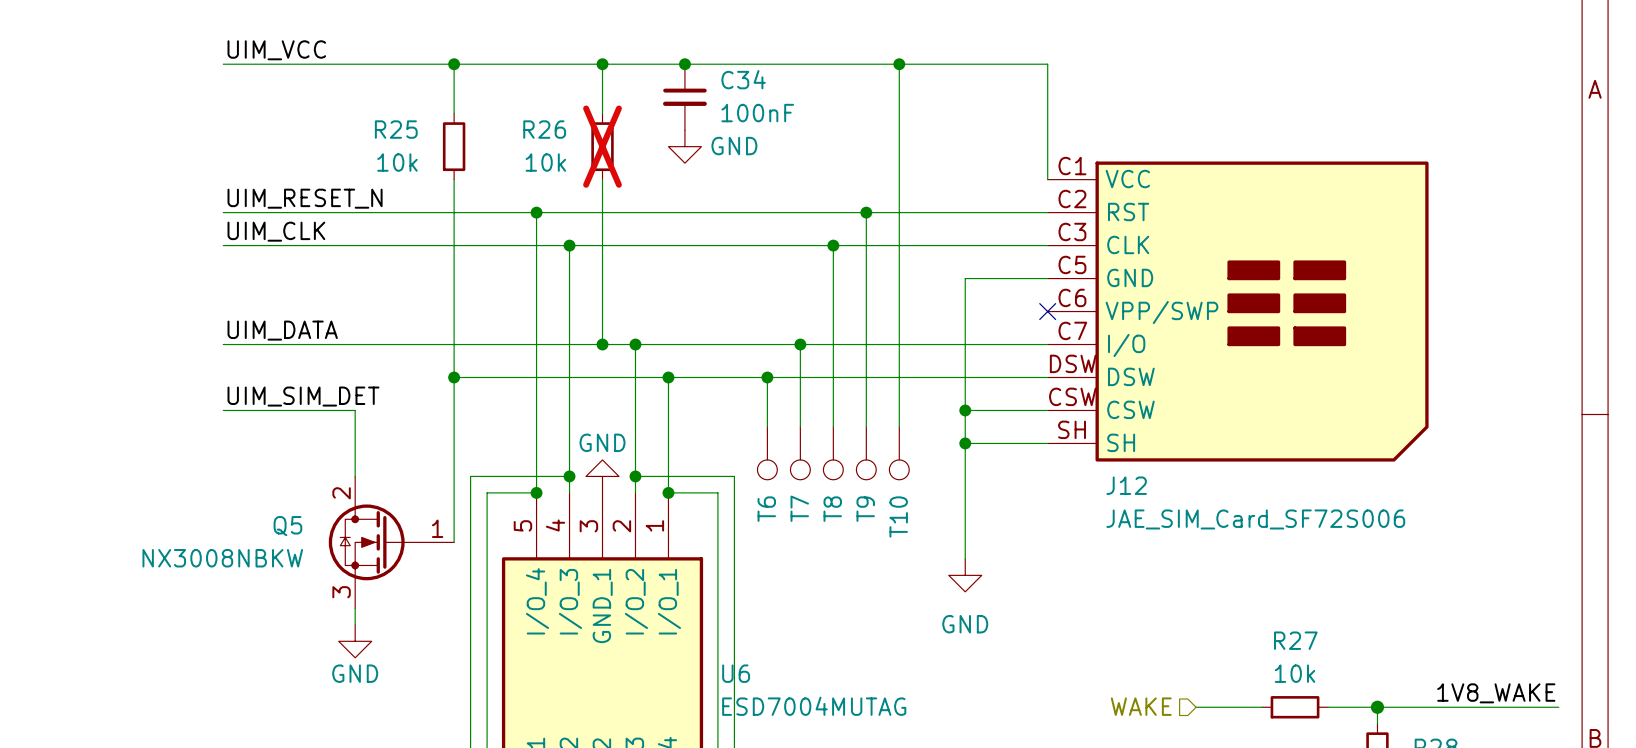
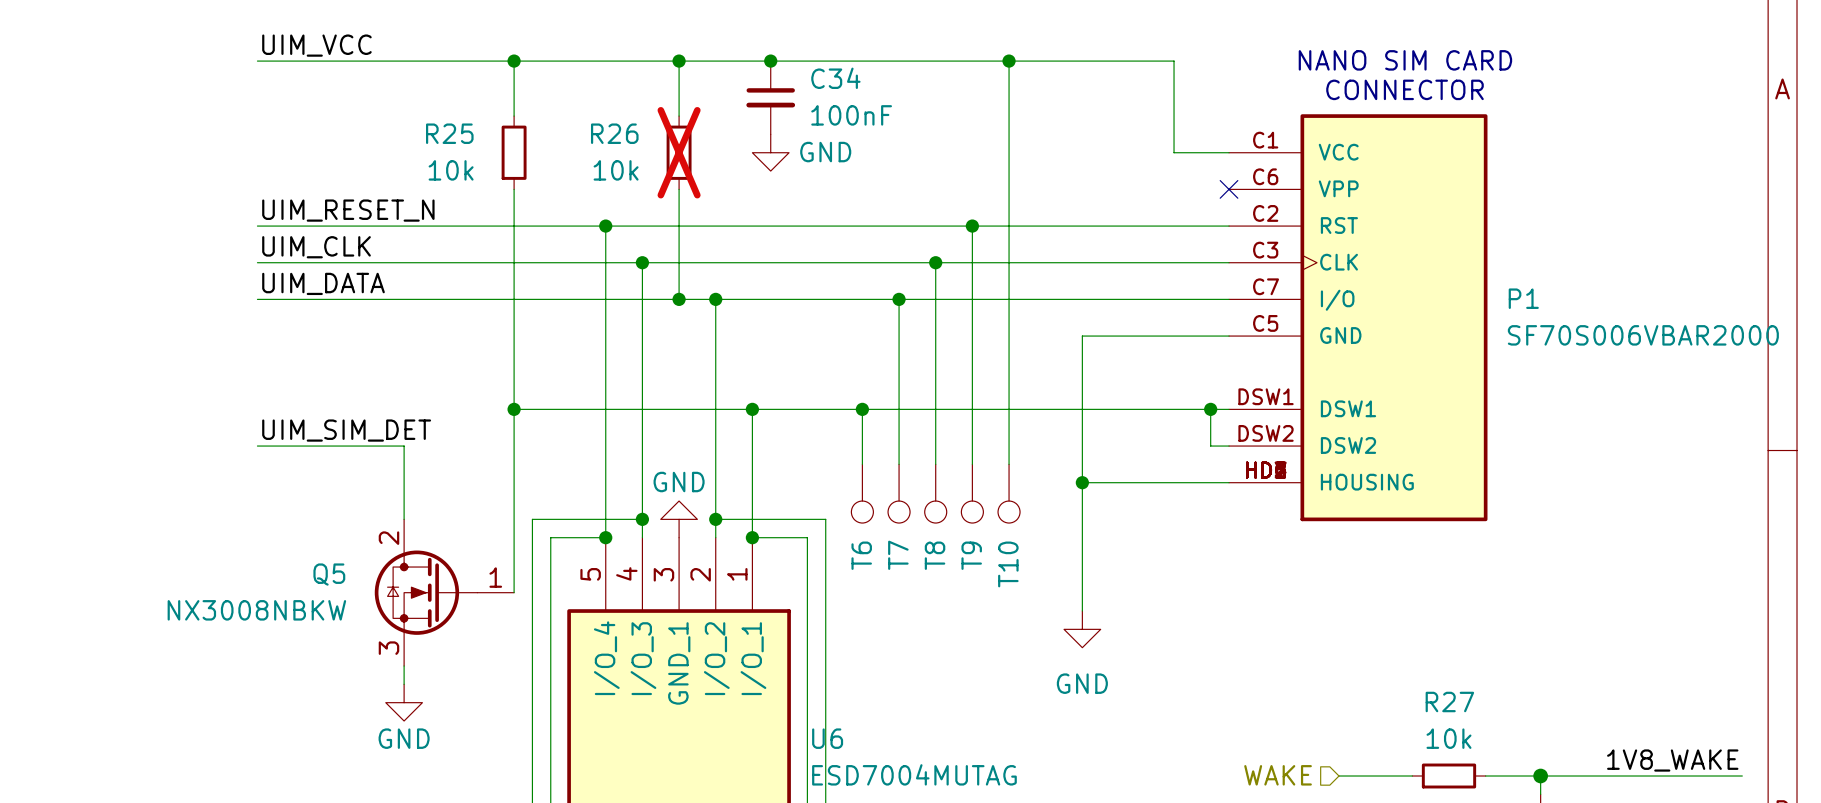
text: none -> NANO SIM CARD (1405, 60)
text: none -> CONNECTOR (1404, 89)
wire: (1047, 146) (1047, 179) -> (1174, 152) (1229, 152)
no-connect mark: none -> (1229, 189)
wire: none -> (257, 299) (1082, 299)
wire: (602, 278) (602, 344) -> (715, 299) (715, 372)
junction: none -> (679, 299)
junction: none -> (715, 299)
wire: none -> (899, 299) (899, 372)
wire: (965, 278) (965, 311) -> (1229, 336) (1082, 336)
P1: none -> SF70S006VBAR2000 (1358, 317)
no-connect mark: (1047, 311) -> none
J12: JAE_SIM_Card_SF72S006 (1238, 311) -> none
label position: UIM_DATA (282, 330) -> UIM_DATA (323, 283)
wire: (223, 344) (1047, 344) -> none
junction: (602, 344) -> none
junction: (635, 344) -> none
junction position: (800, 344) -> (899, 299)
wire: none -> (1210, 409) (1210, 446) (1229, 446)
junction: none -> (1210, 409)
wire: (965, 410) (1047, 410) -> none
junction: (965, 410) -> none

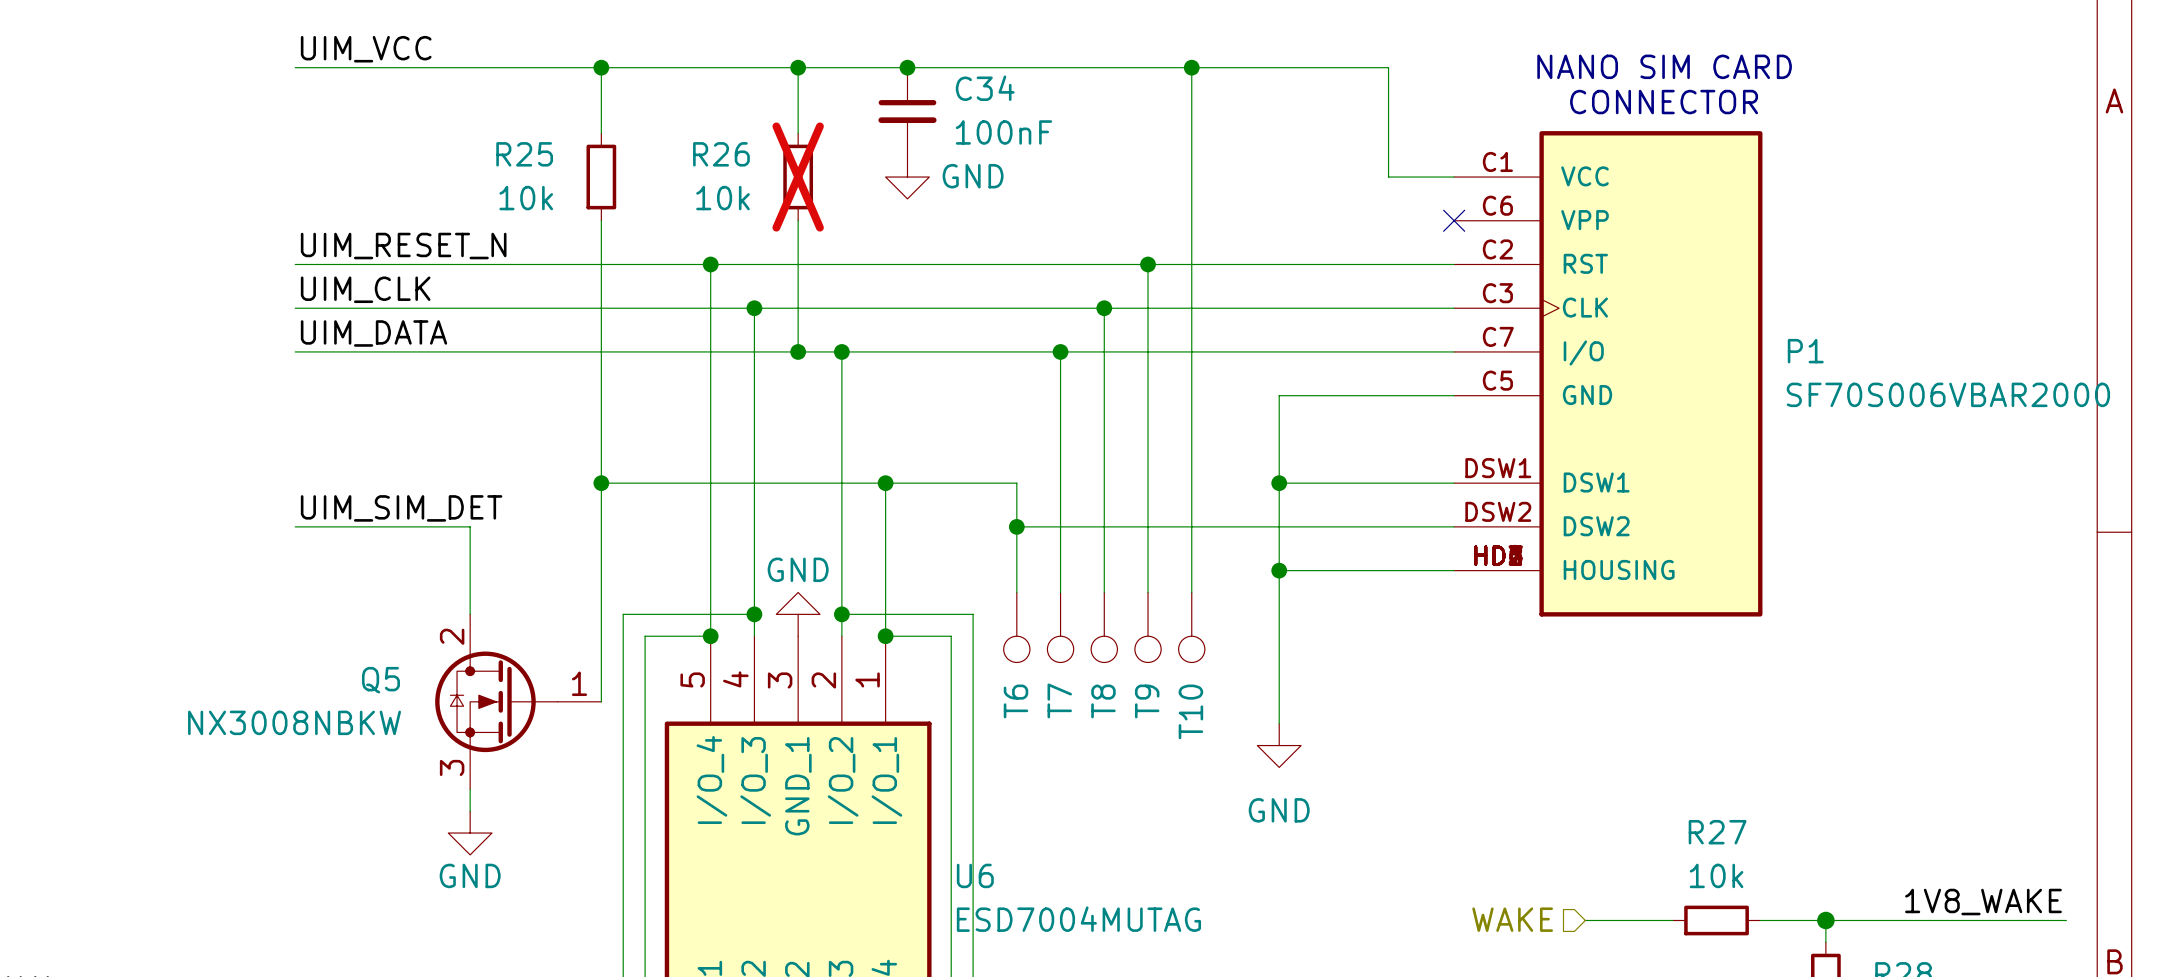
wire: (862, 409) (1082, 409) -> none
junction position: (862, 409) -> (1016, 526)
junction: none -> (1279, 483)
wire: (1210, 409) (1210, 446) -> (1016, 526) (1432, 526)
junction: (1210, 409) -> none
T6 position: (862, 493) -> (1016, 627)
T7 position: (899, 493) -> (1060, 627)
T8 position: (935, 493) -> (1104, 627)
T9 position: (972, 493) -> (1148, 627)
T10 position: (1009, 493) -> (1191, 627)

